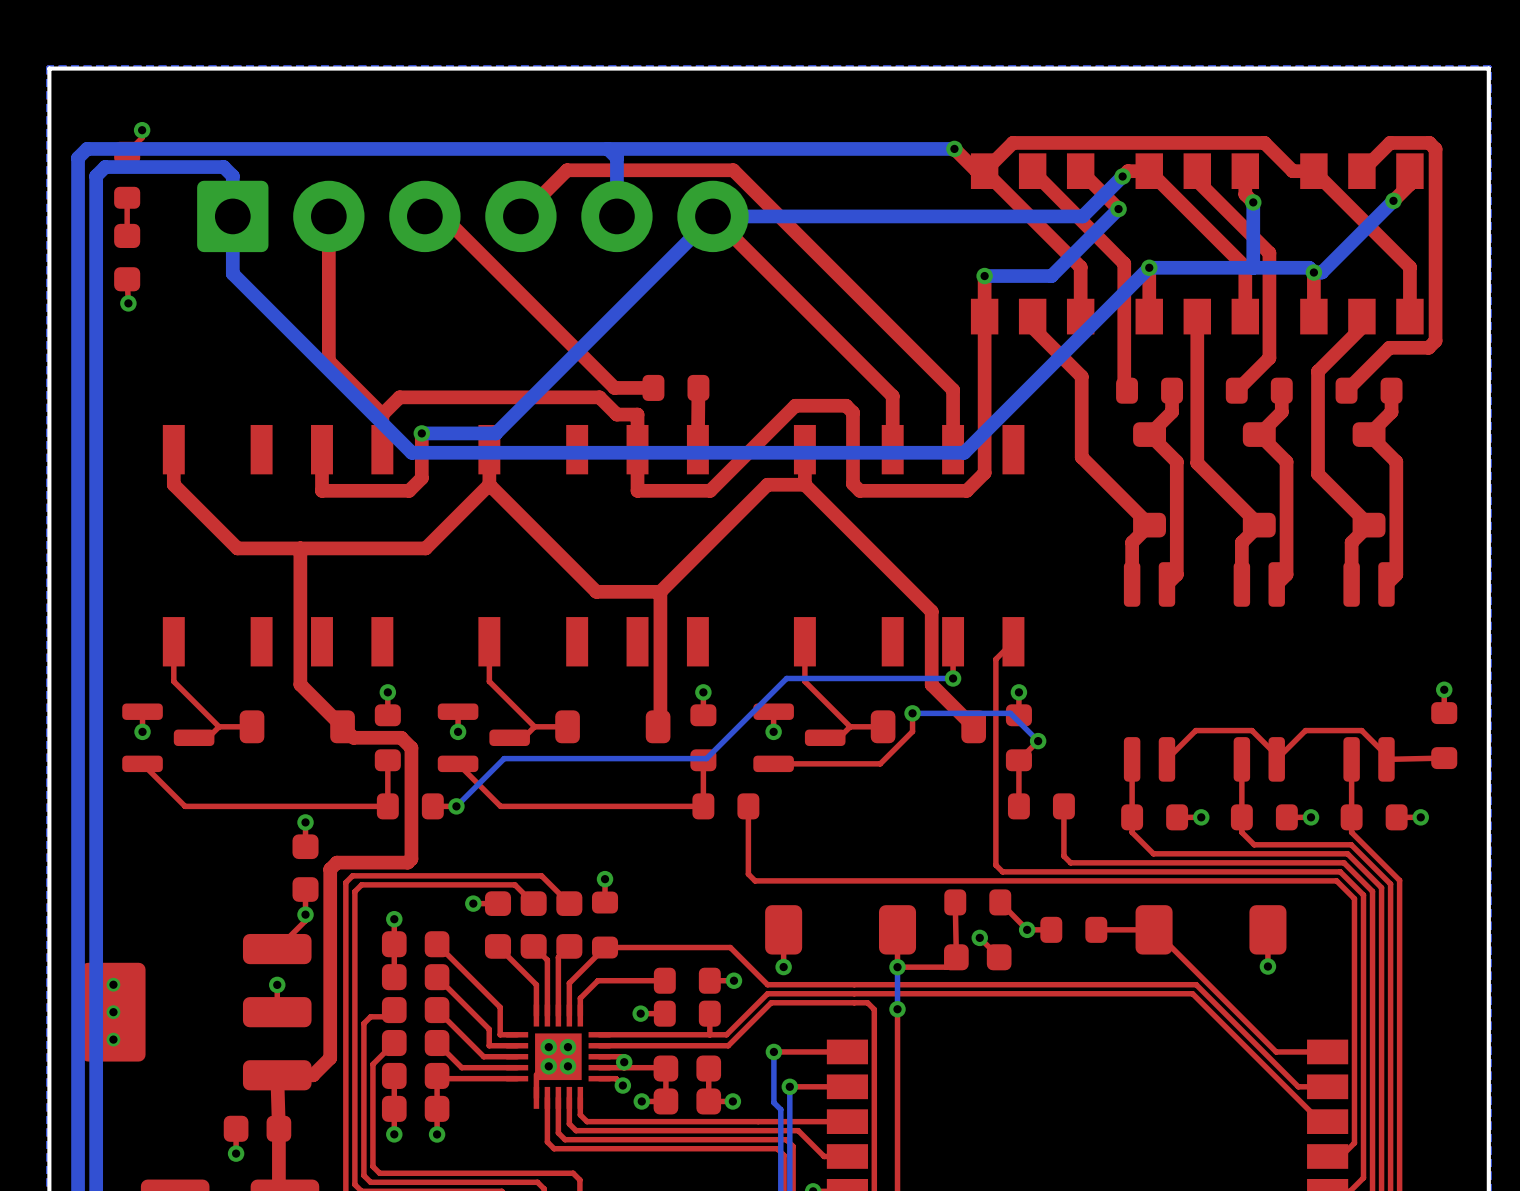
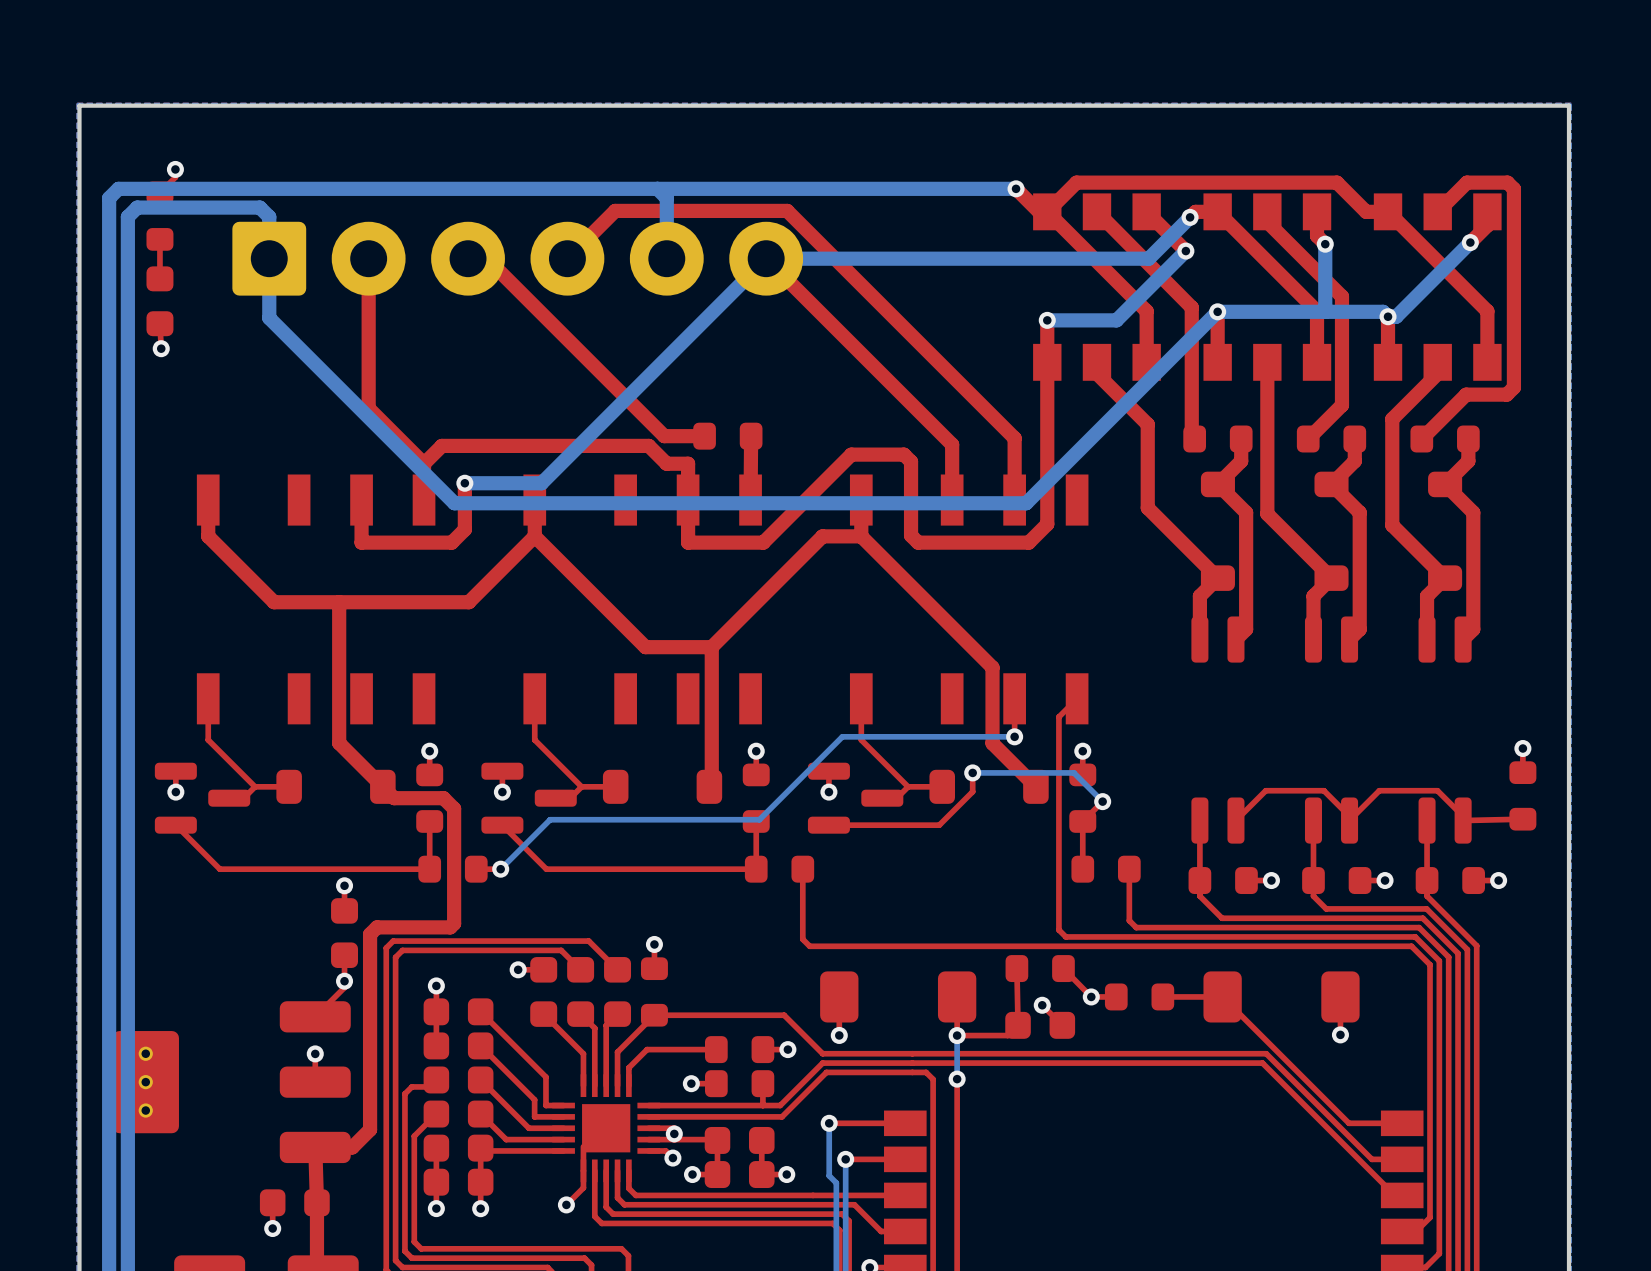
via: (548, 1047) -> none
via: (567, 1047) -> none
via: (548, 1066) -> none
via: (567, 1066) -> none
top track: none -> (583, 1170) (583, 1187) (566, 1204)
via: none -> (566, 1204)

